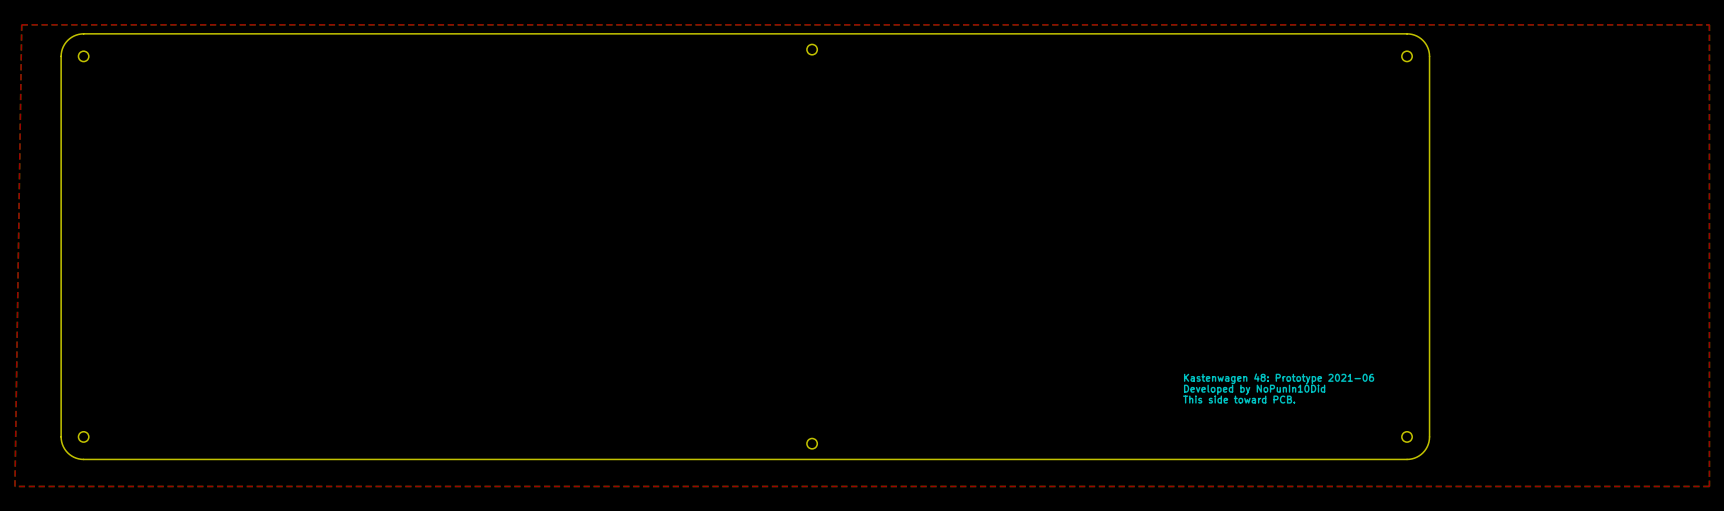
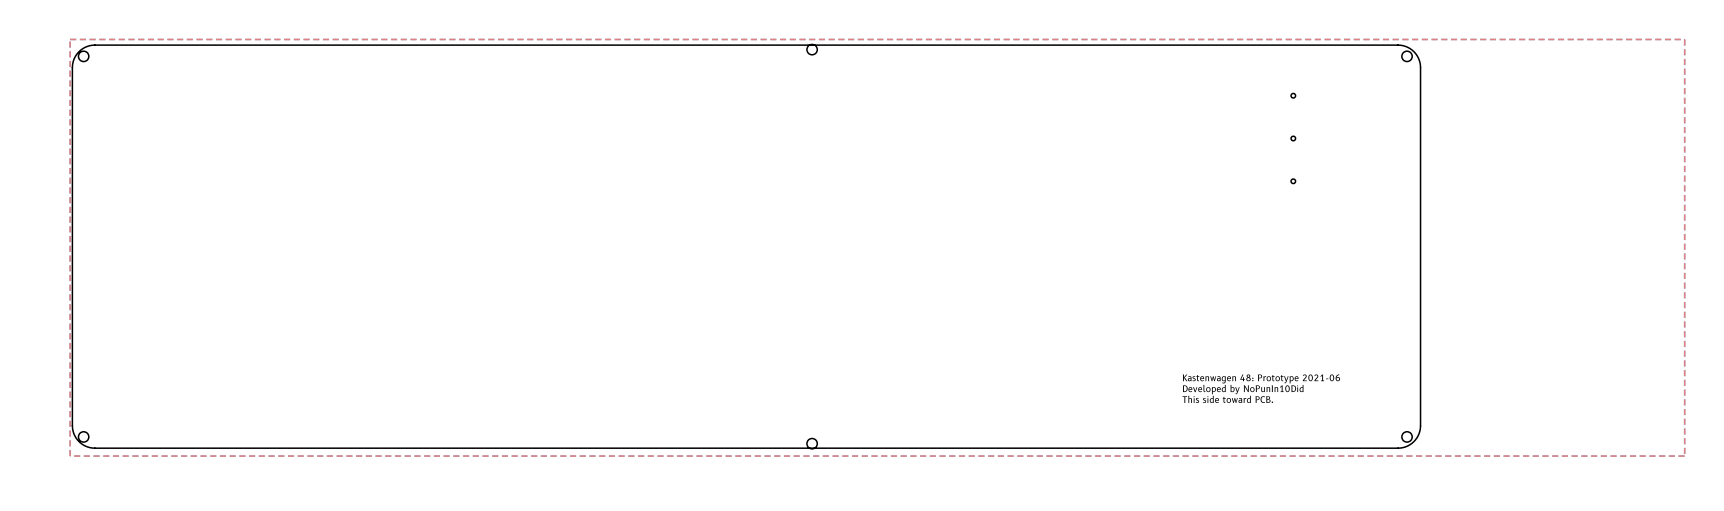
top zone outline: (21, 24) (14, 486) (1709, 486) (1709, 24) (21, 24) -> (70, 39) (70, 456) (1684, 456) (1684, 39) (70, 39)
board edge: (83, 33) (1414, 35) (1426, 44) (1429, 56) (1428, 444) (1421, 454) (1407, 459) (76, 458) (66, 450) (61, 436) (61, 56) (63, 46) (67, 40) (76, 35) (83, 33) -> (94, 45) (87, 46) (78, 51) (74, 57) (72, 67) (72, 425) (77, 439) (87, 446) (1398, 448) (1412, 443) (1419, 433) (1420, 67) (1417, 55) (1405, 46) (94, 45)
round board edge: none -> [1290, 93, 1297, 99]
round board edge: none -> [1290, 135, 1297, 142]
round board edge: none -> [1290, 178, 1297, 184]

